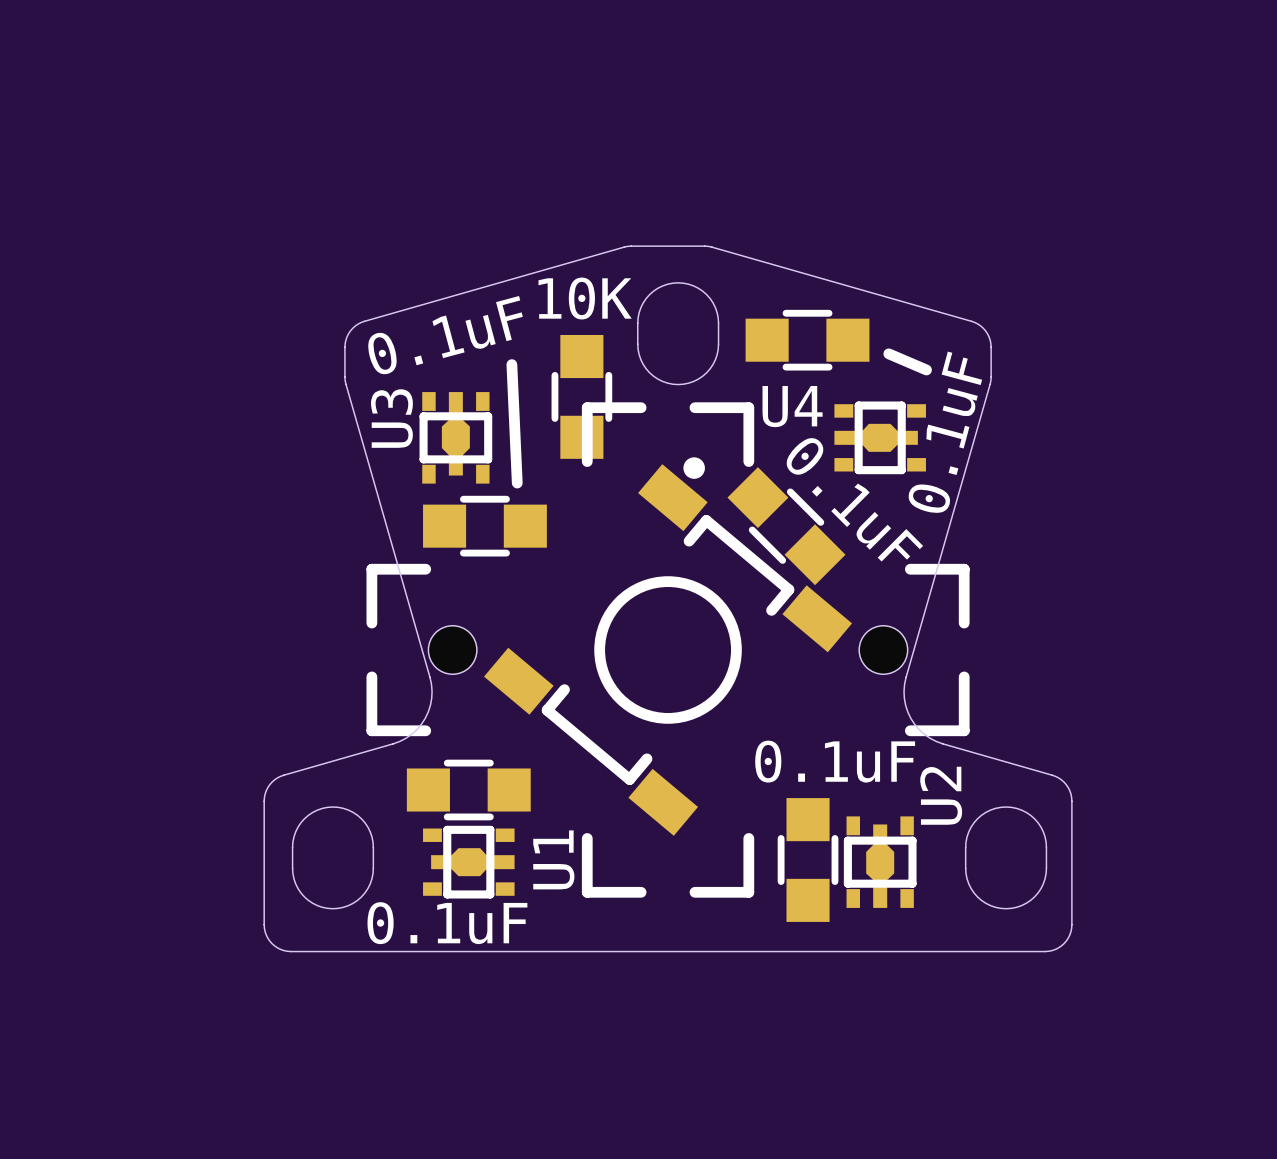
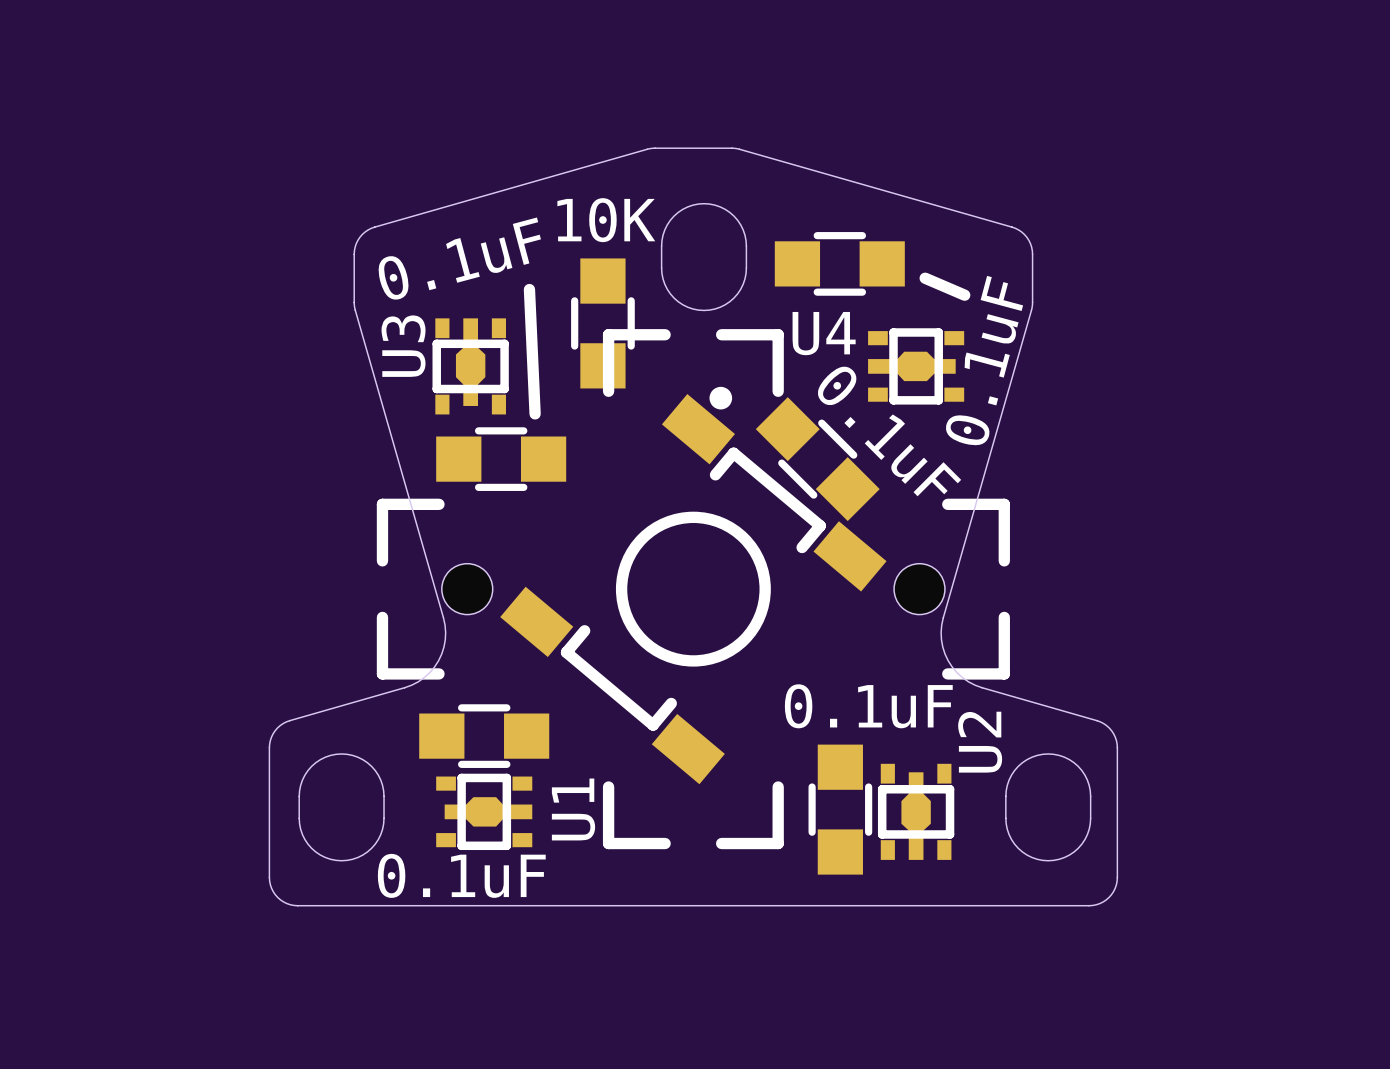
board edge: (624, 247) (712, 247) (974, 322) (987, 333) (991, 347) -> (647, 149) (737, 148) (1012, 227) (1021, 232) (1030, 243) (1032, 271)
board edge: (624, 247) (361, 322) (348, 333) (344, 347) -> (647, 149) (371, 228) (362, 234) (356, 243) (354, 271)

